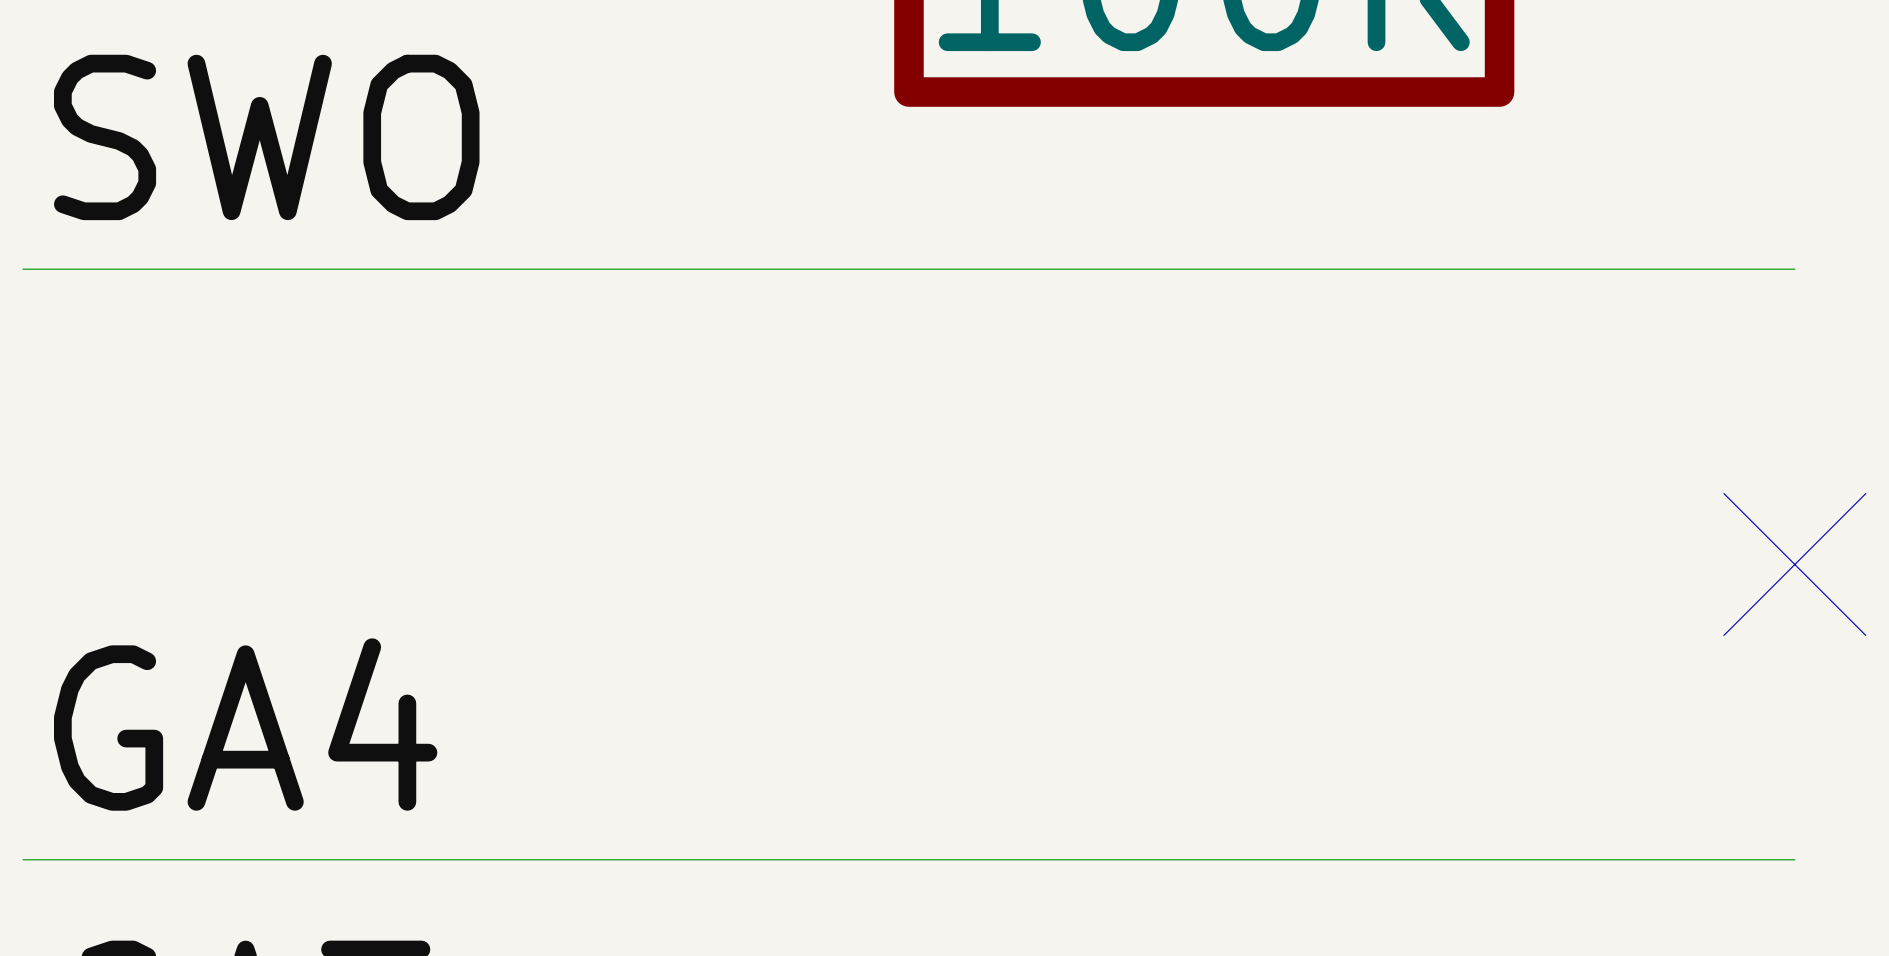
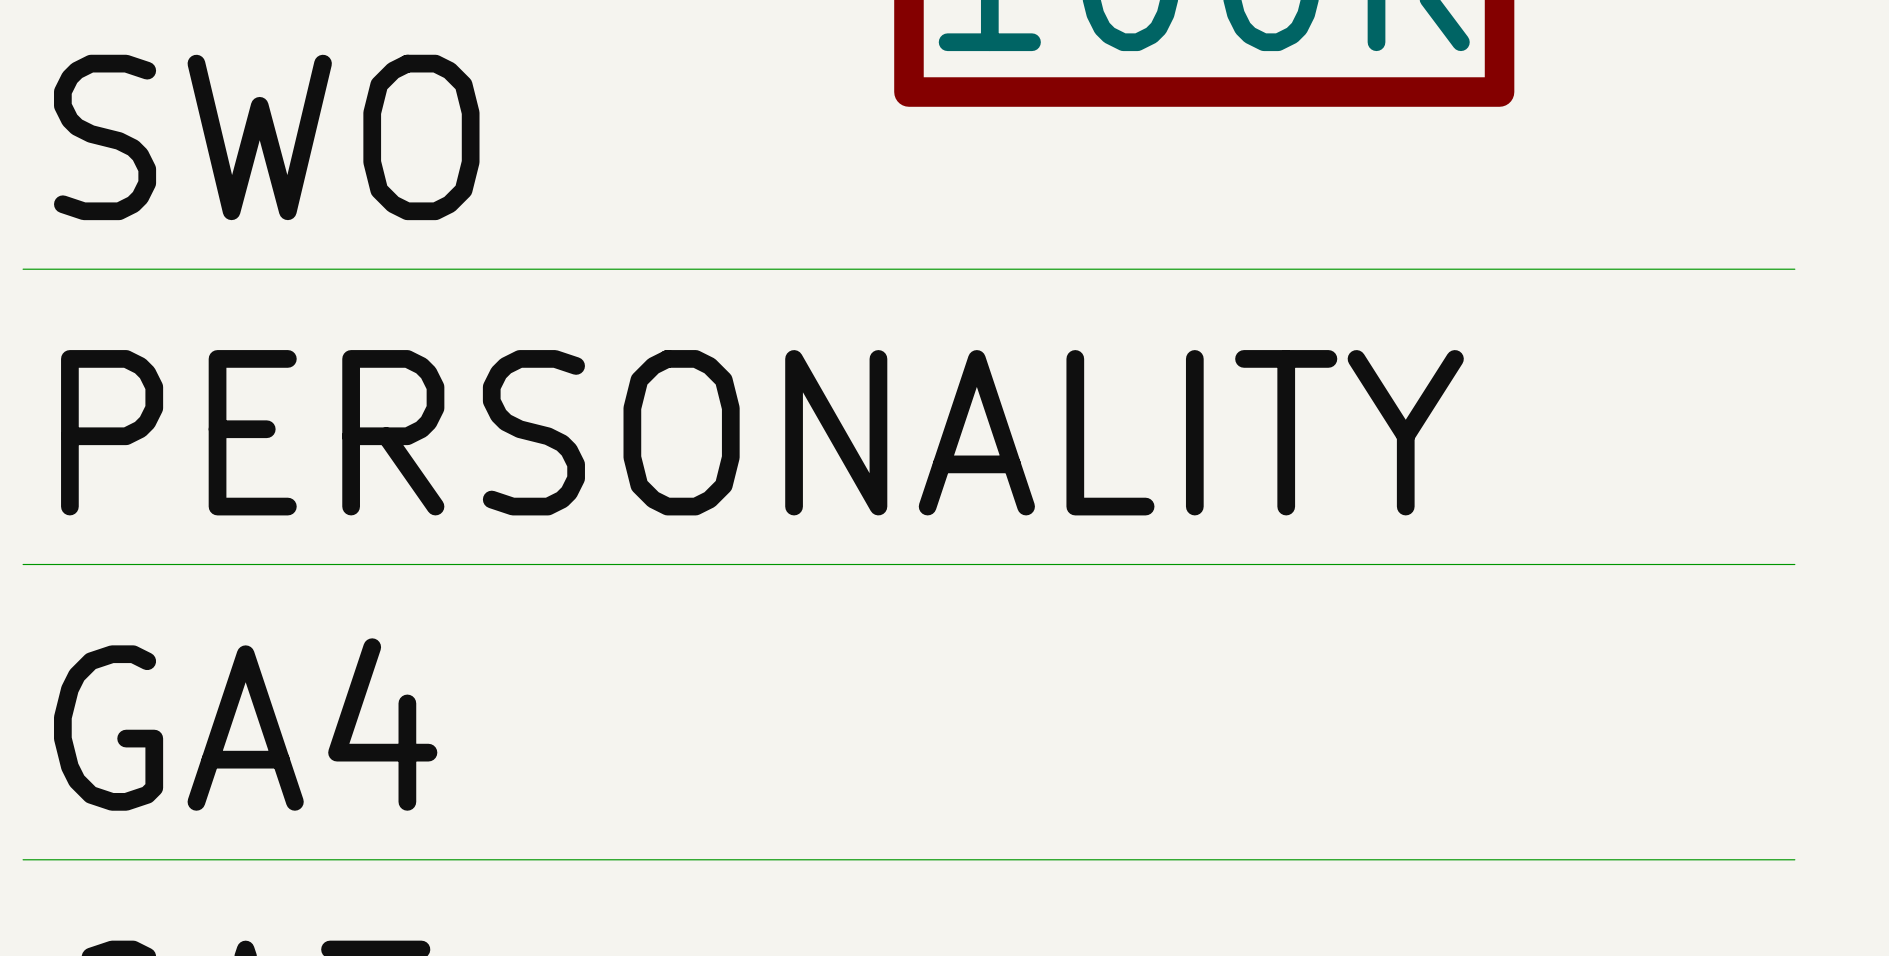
label: none -> PERSONALITY (762, 432)
wire: none -> (23, 564) (1794, 564)
no-connect mark: (1794, 564) -> none

